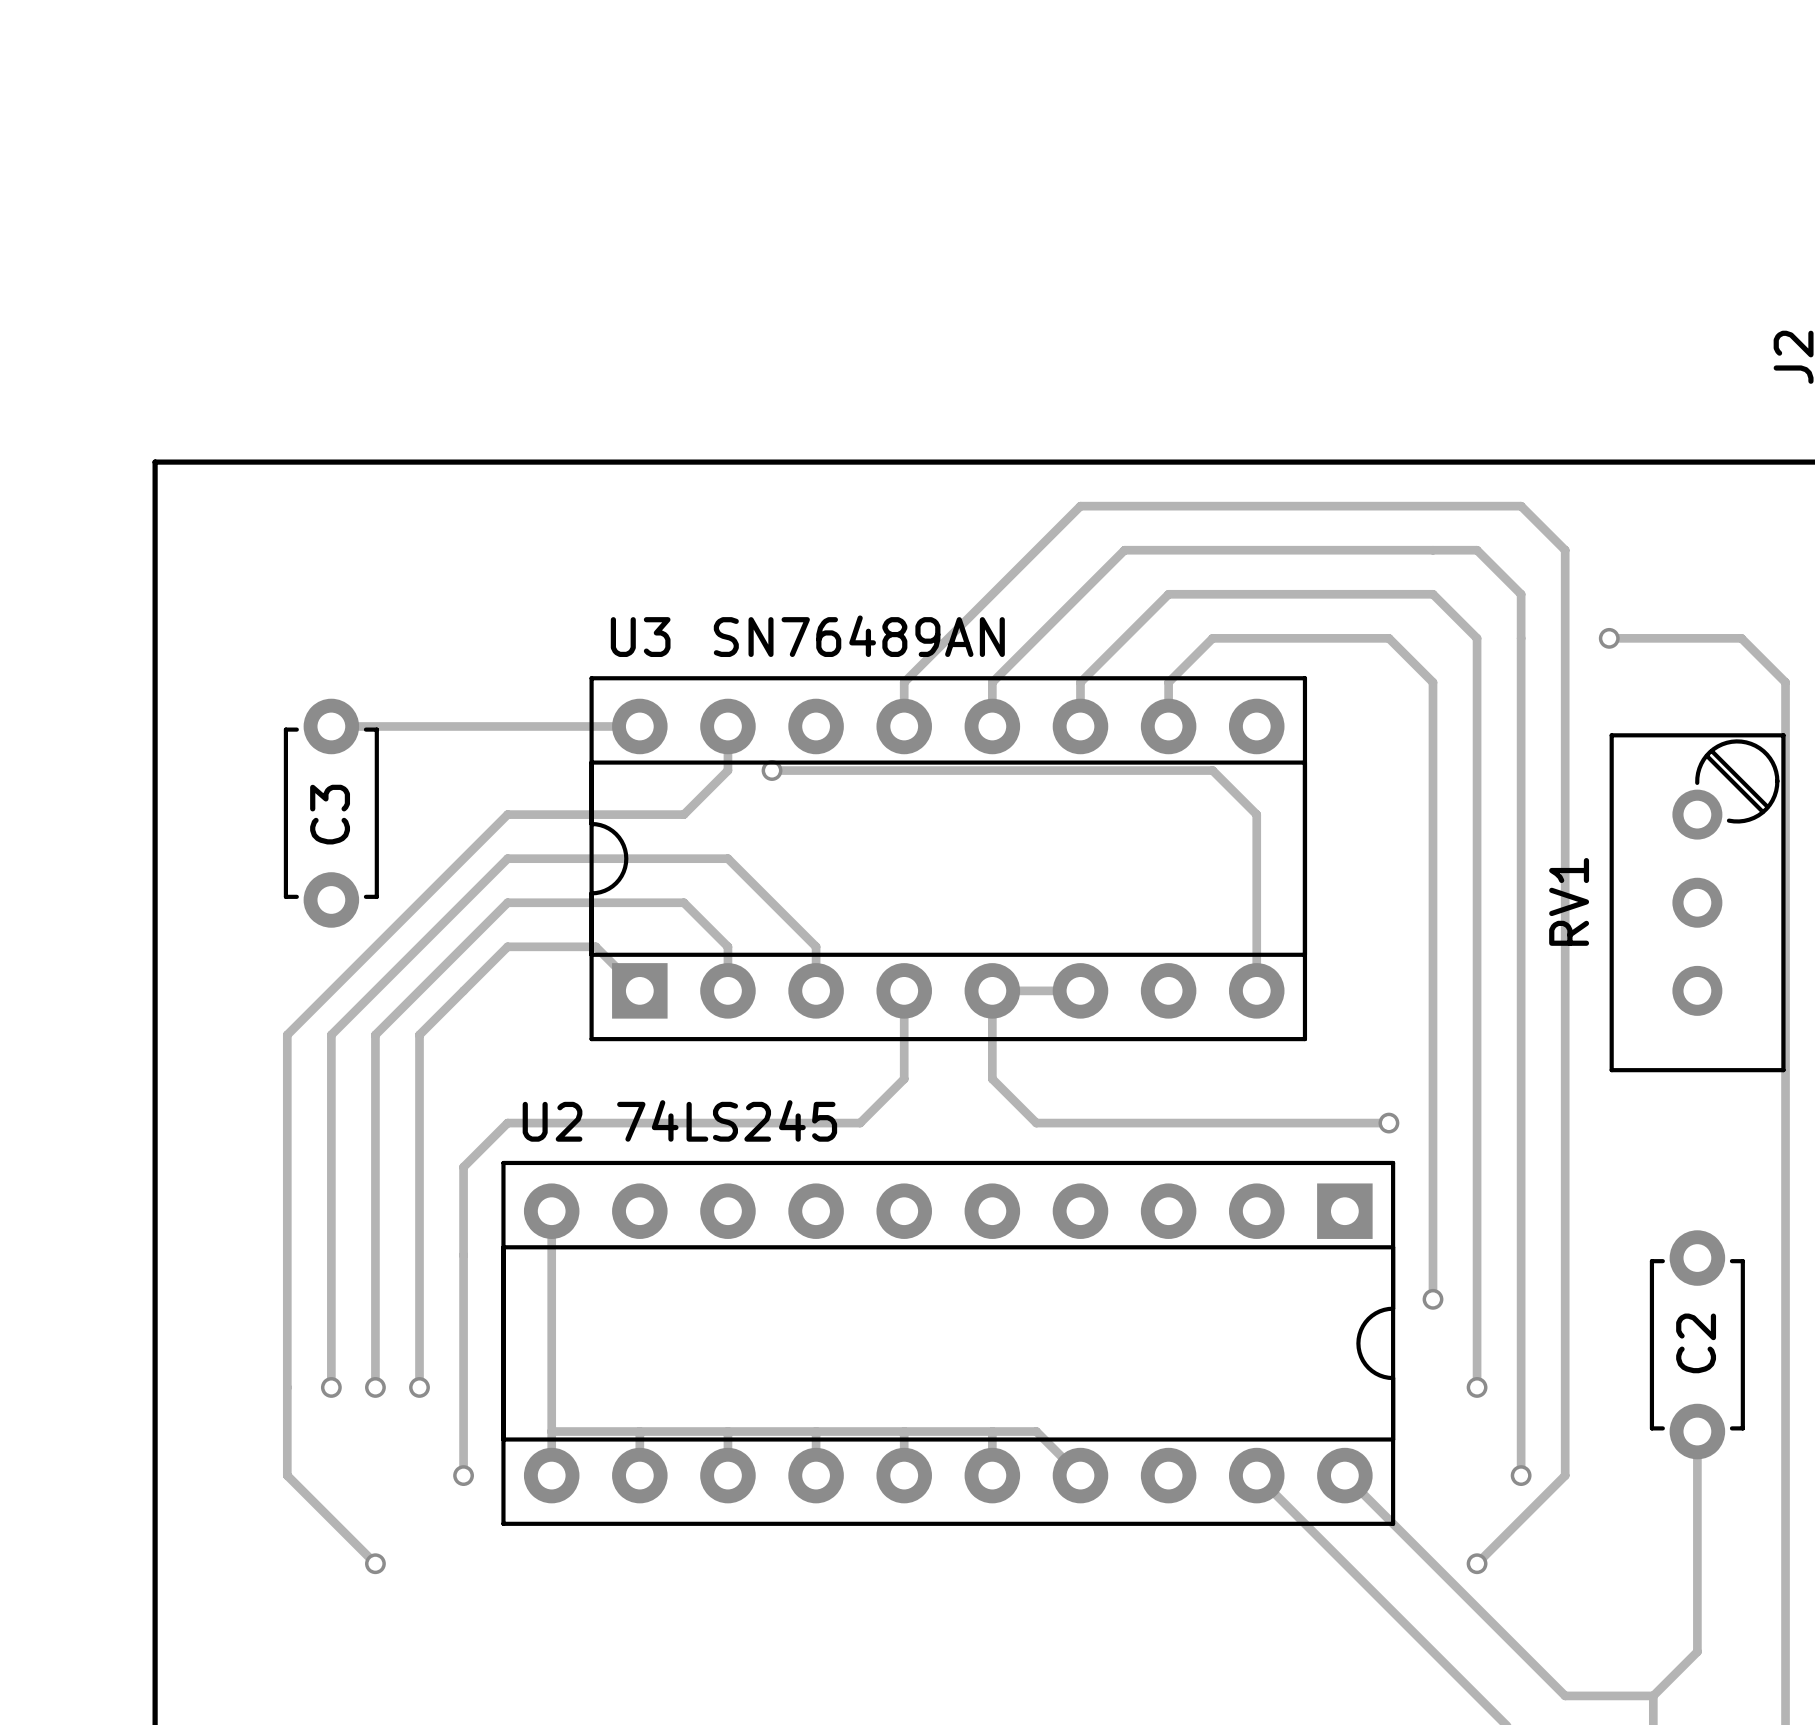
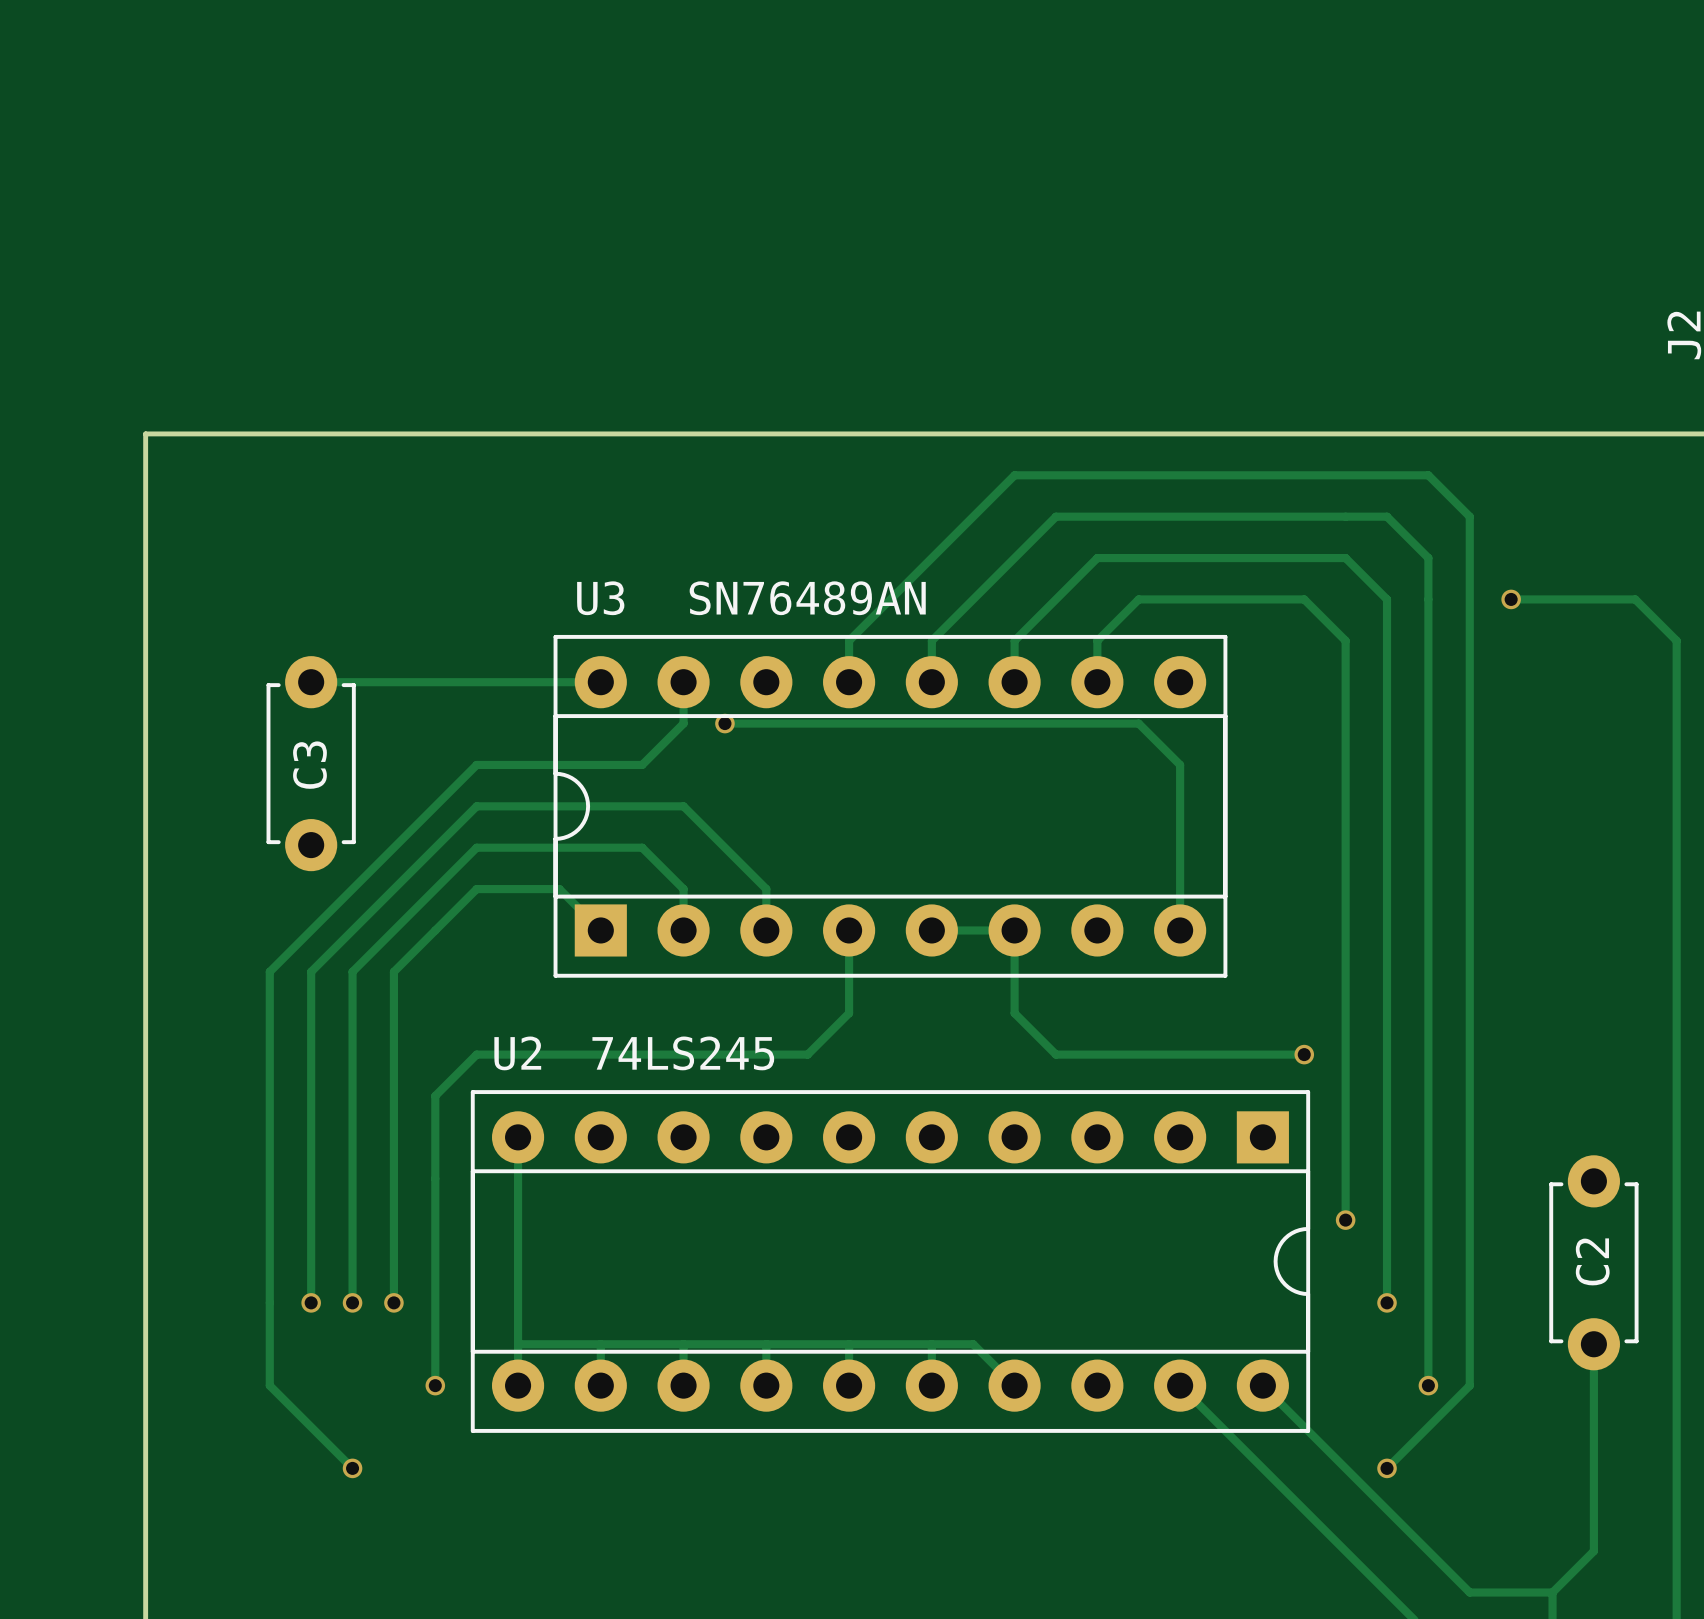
RV1: (1697, 902) -> none
track: (992, 990) (992, 1079) (1036, 1123) (1124, 1123) -> (1014, 930) (1014, 1013) (1055, 1054)

